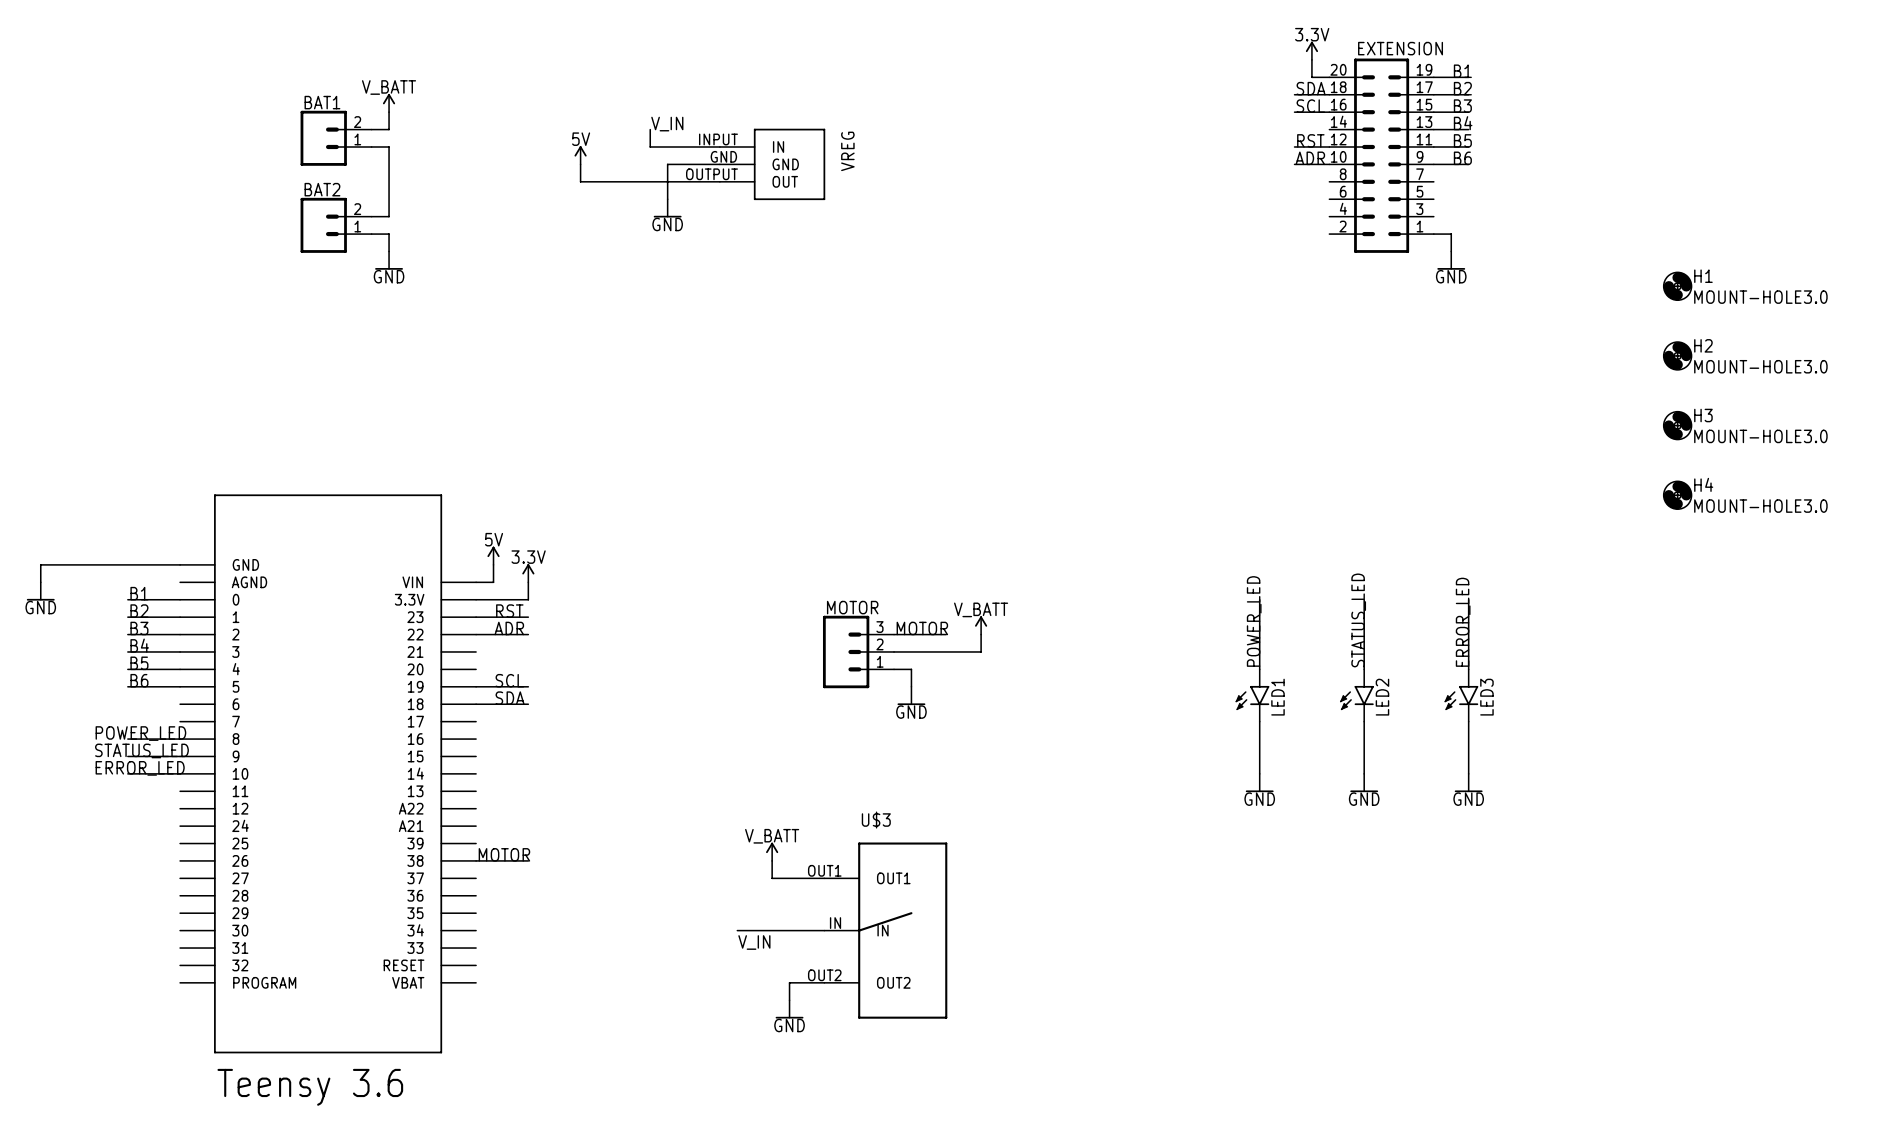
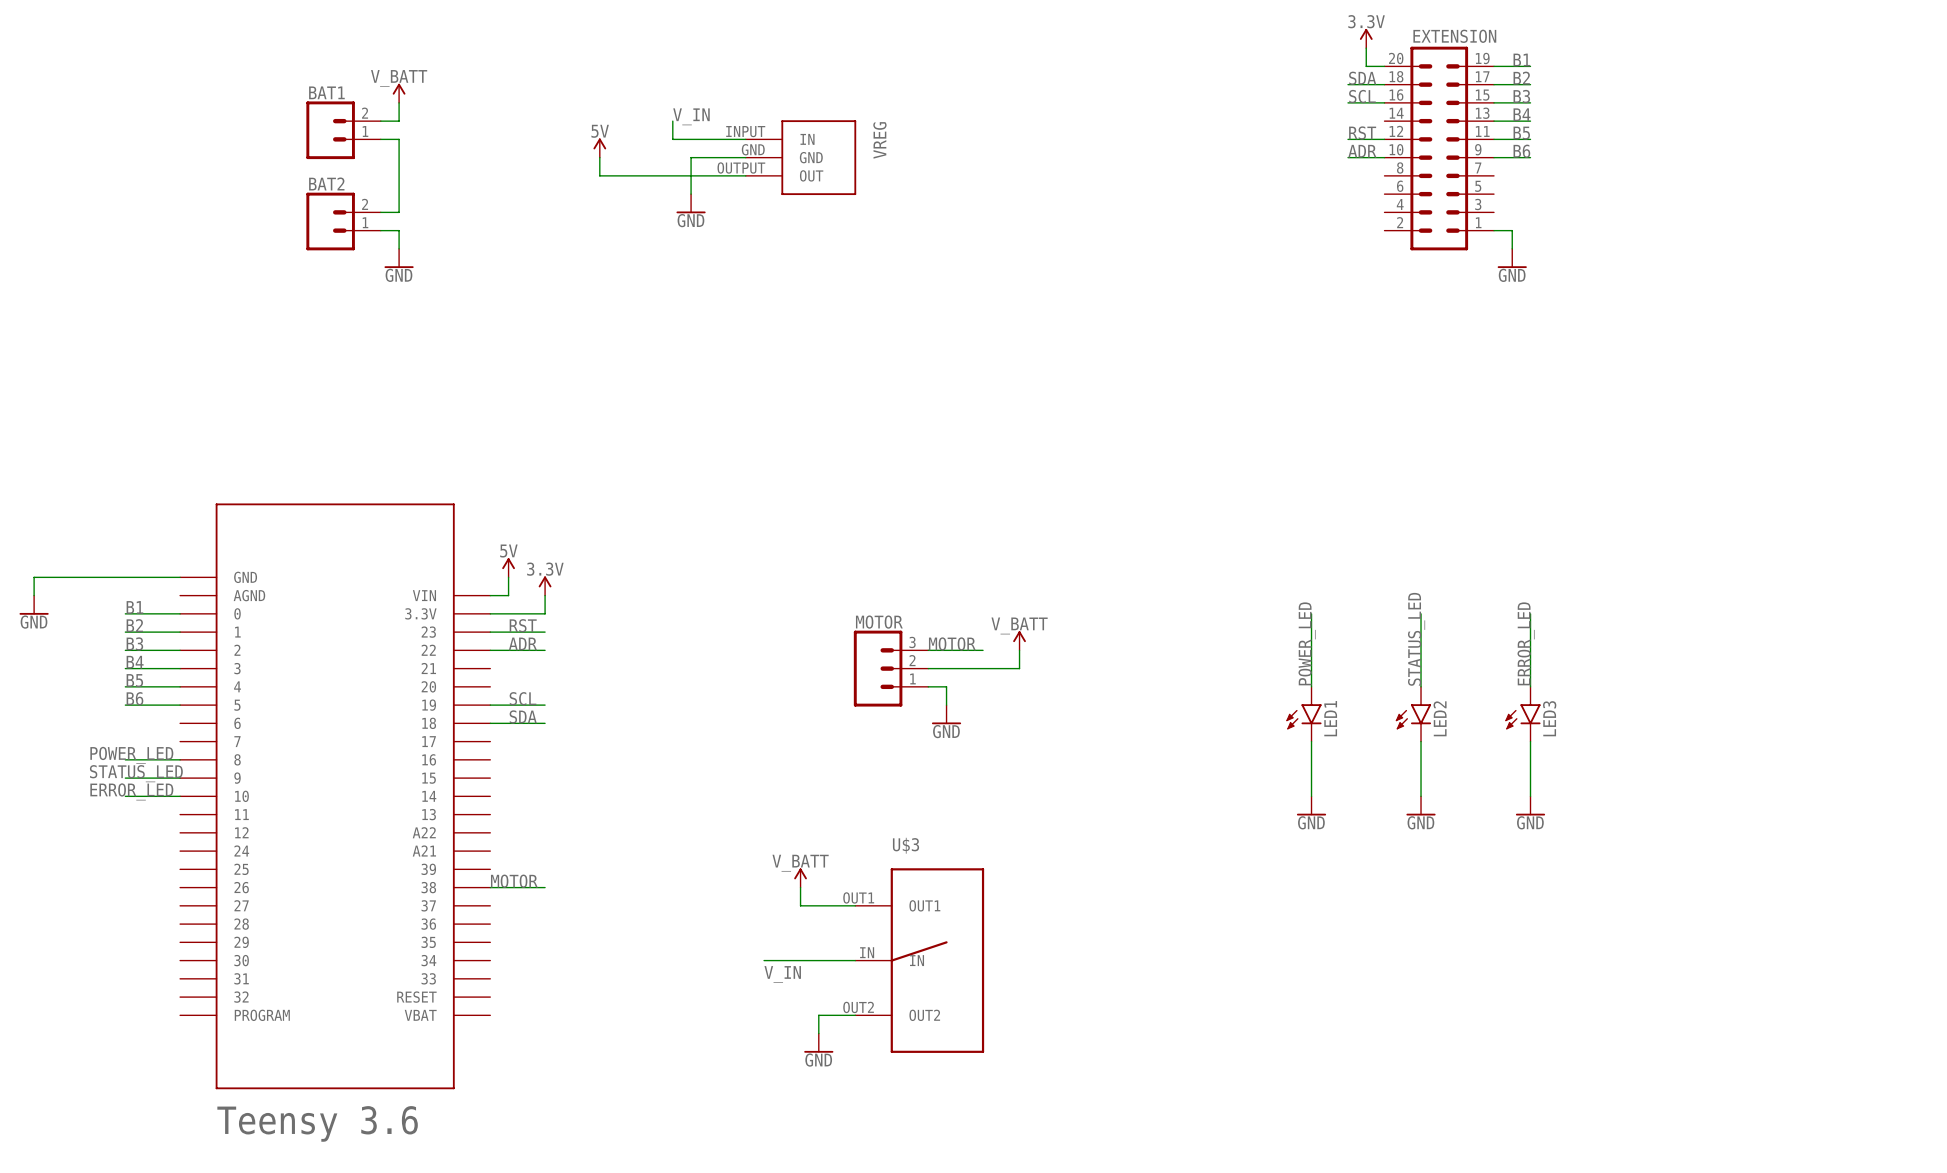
H1: MOUNT-HOLE3.0 (1677, 286) -> none
H2: MOUNT-HOLE3.0 (1677, 355) -> none
H3: MOUNT-HOLE3.0 (1677, 425) -> none
H4: MOUNT-HOLE3.0 (1677, 495) -> none

